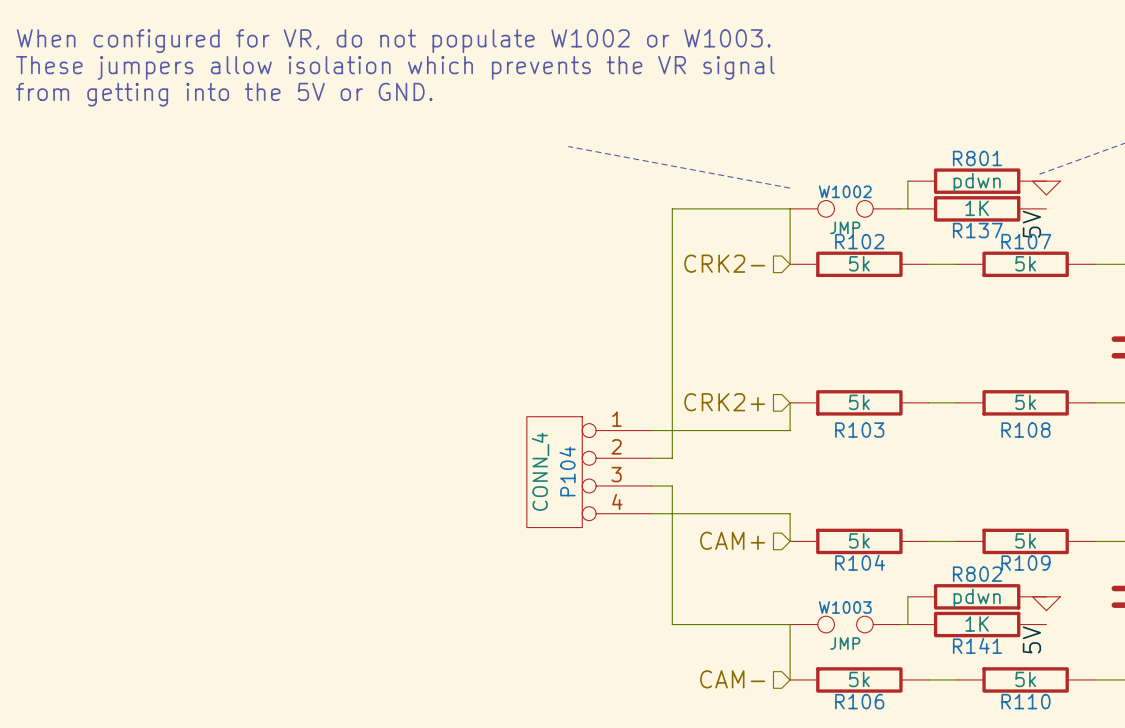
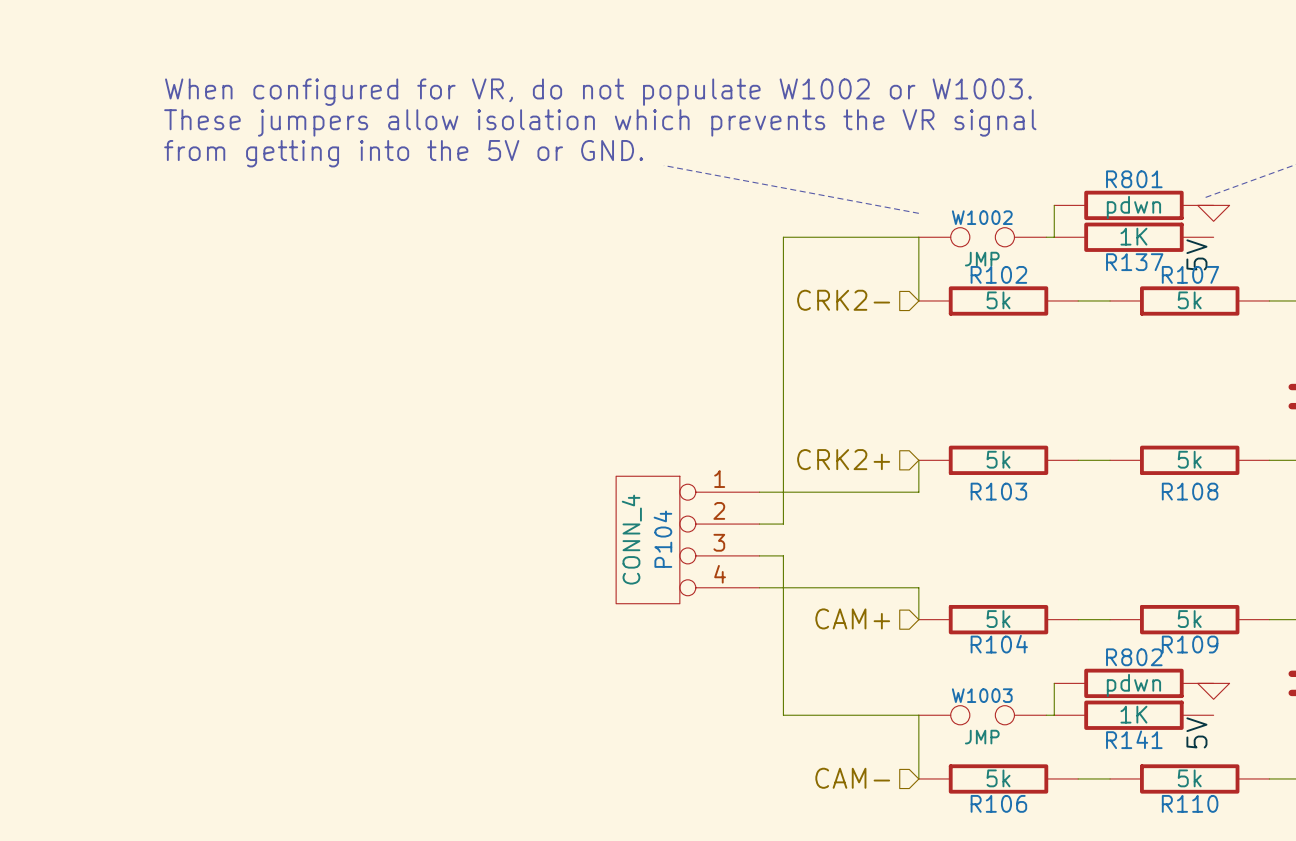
text position: When configured for VR, do not populate W1002 or W1003. (393, 41) -> When configured for VR, do not populate W1002 or W1003. (598, 92)
text position: These jumpers allow isolation which prevents the VR signal (395, 67) -> These jumpers allow isolation which prevents the VR signal (600, 122)
text position: from getting into the 5V or GND. (224, 94) -> from getting into the 5V or GND. (403, 153)

